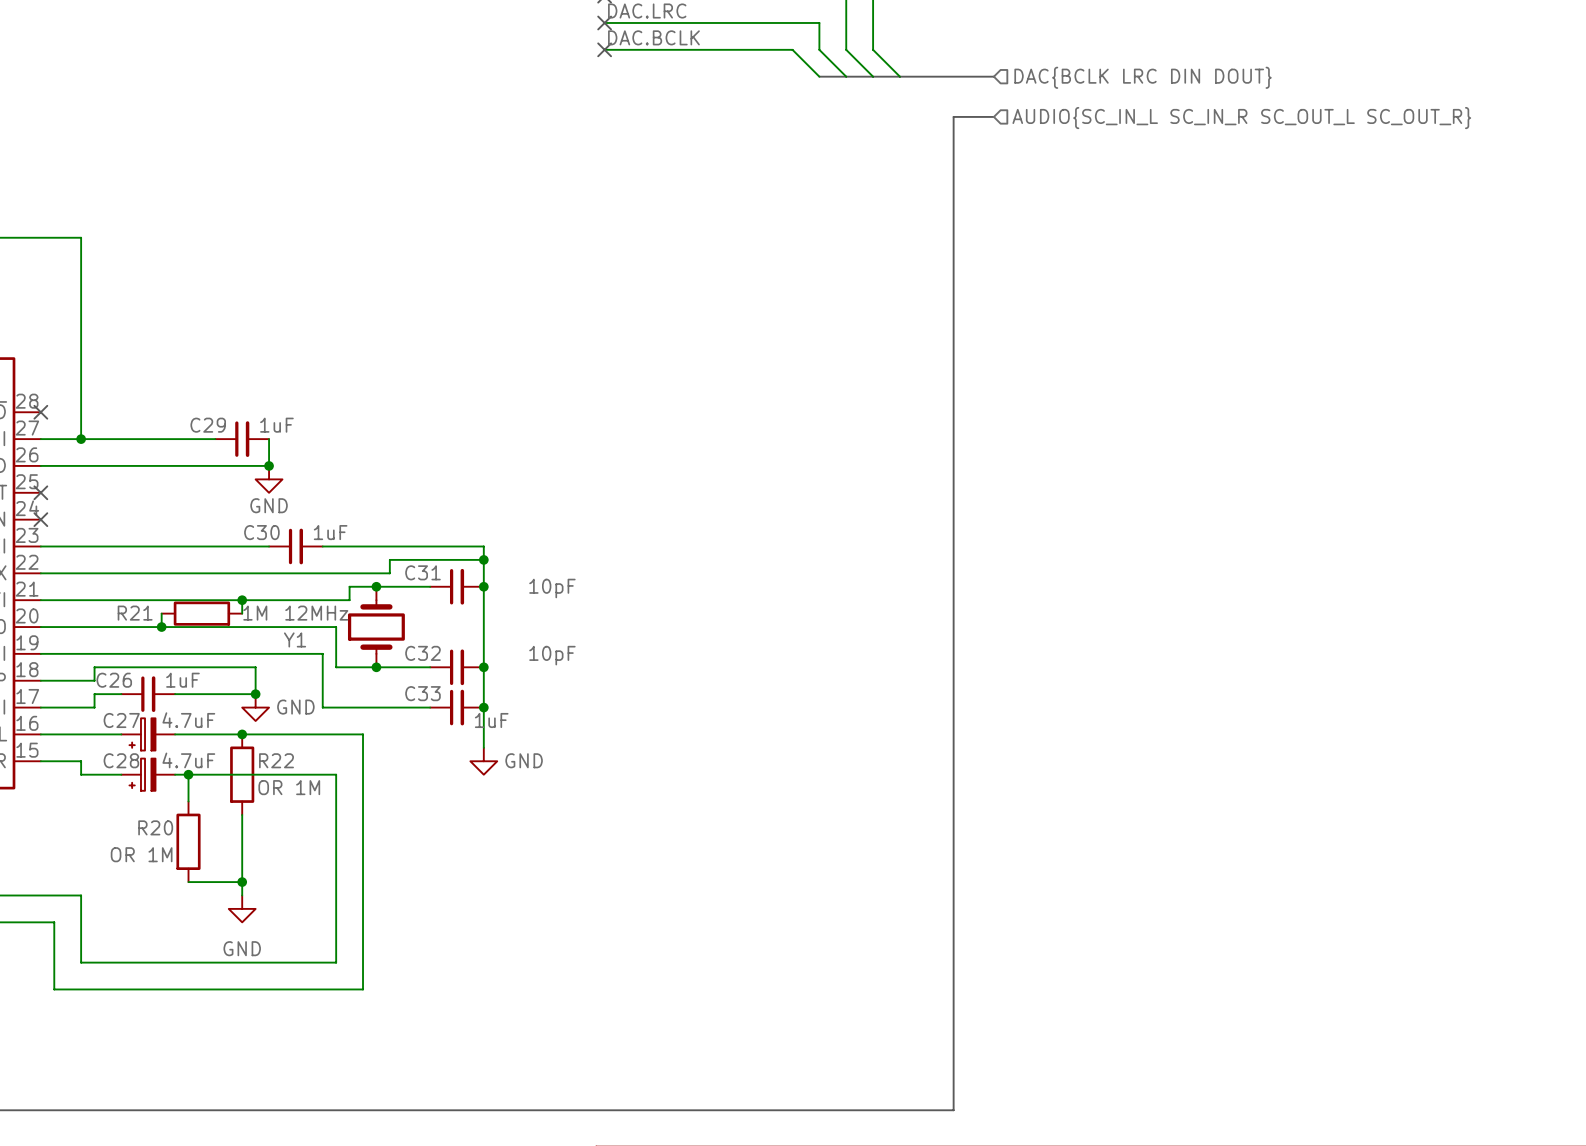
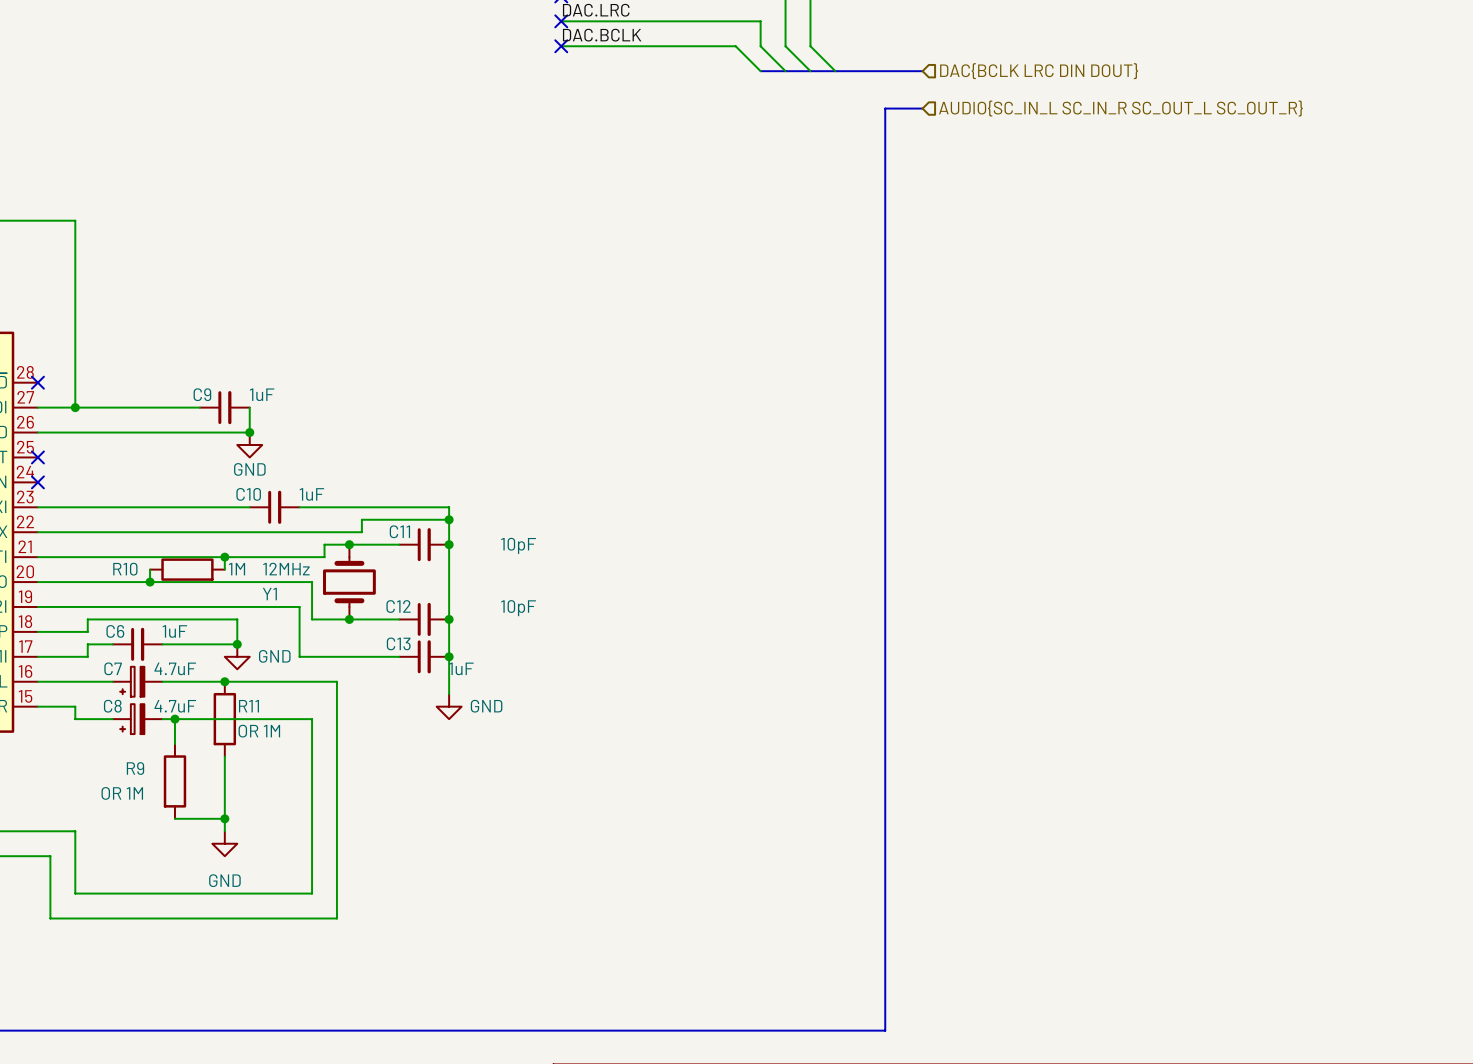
C29 name: C29 (208, 425) -> C9 (202, 394)
C30 name: C30 (261, 532) -> C10 (248, 494)
C31 name: C31 (422, 572) -> C11 (399, 531)
R21 name: R21 (135, 613) -> R10 (125, 569)
C32 name: C32 (422, 653) -> C12 (398, 606)
C26 name: C26 (114, 680) -> C6 (115, 631)
C33 name: C33 (422, 693) -> C13 (398, 643)
C27 name: C27 (121, 720) -> C7 (113, 668)
C28 name: C28 (121, 760) -> C8 (112, 706)
R22 name: R22 (276, 760) -> R11 (248, 706)
R20 name: R20 (155, 827) -> R9 (135, 768)

